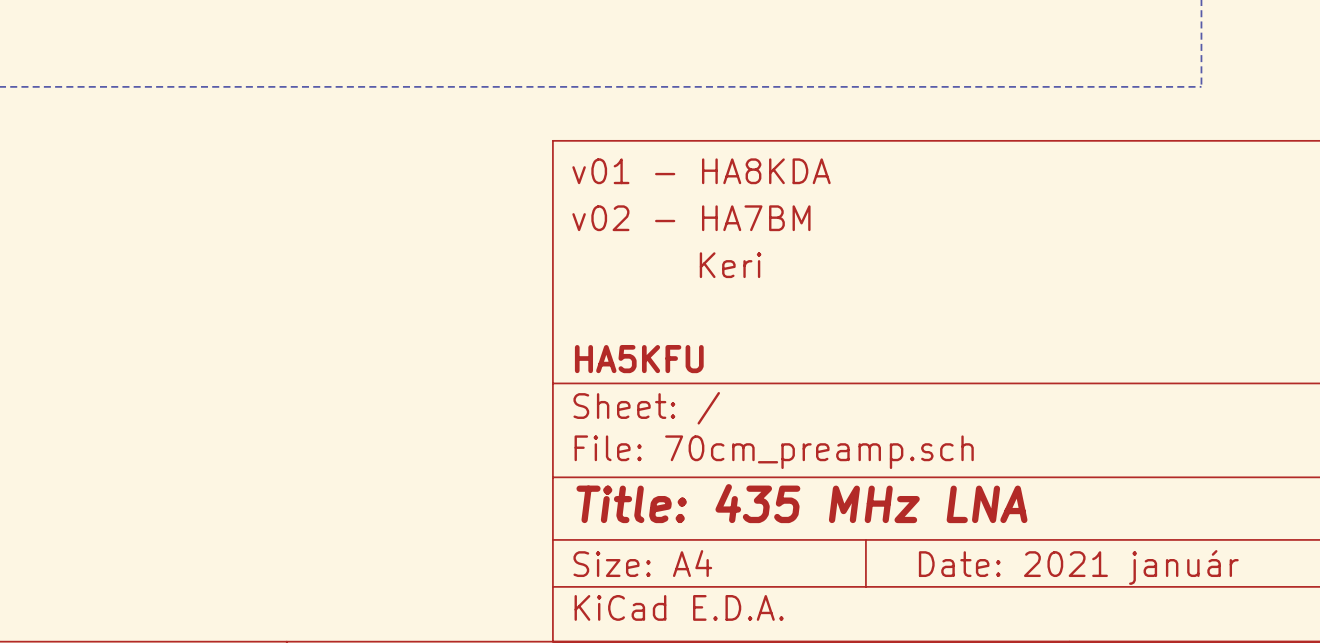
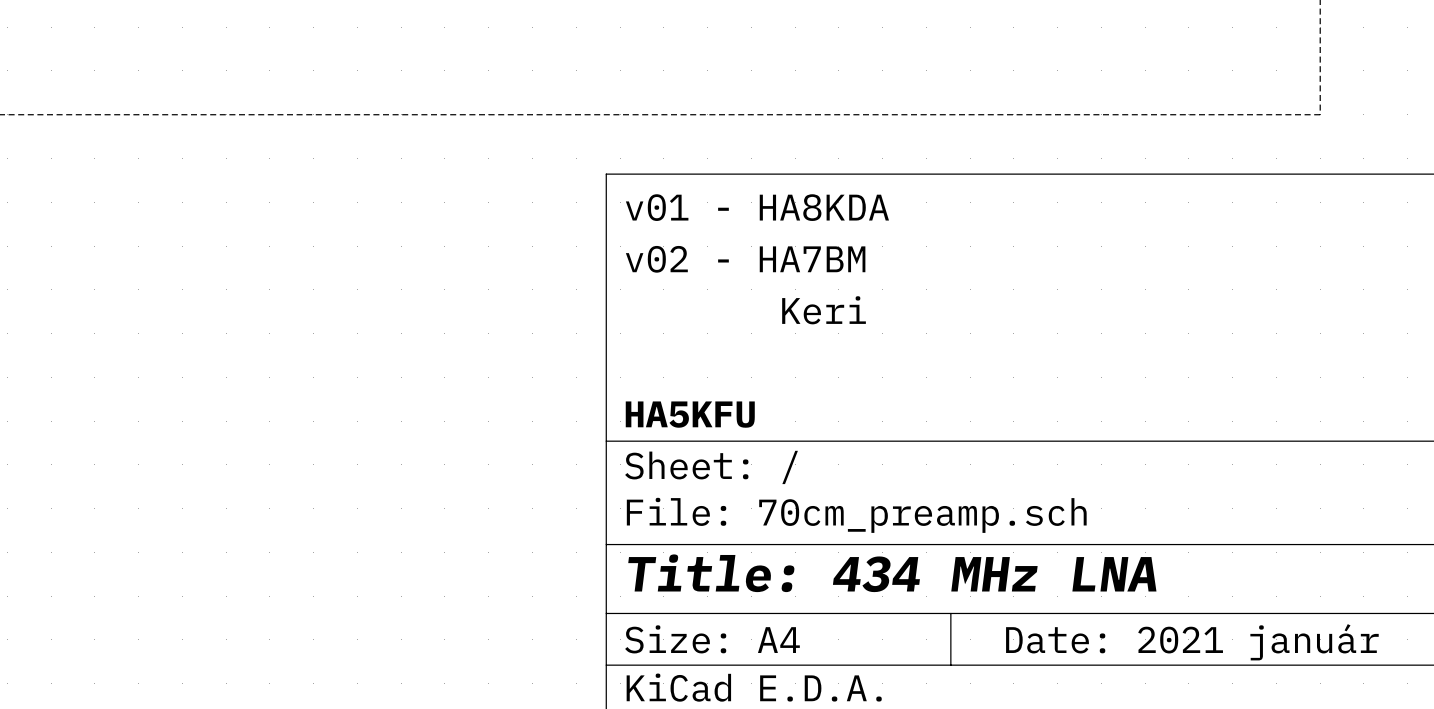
title block: Title: 435 MHz LNA (801, 503) -> Title: 434 MHz LNA (892, 573)

